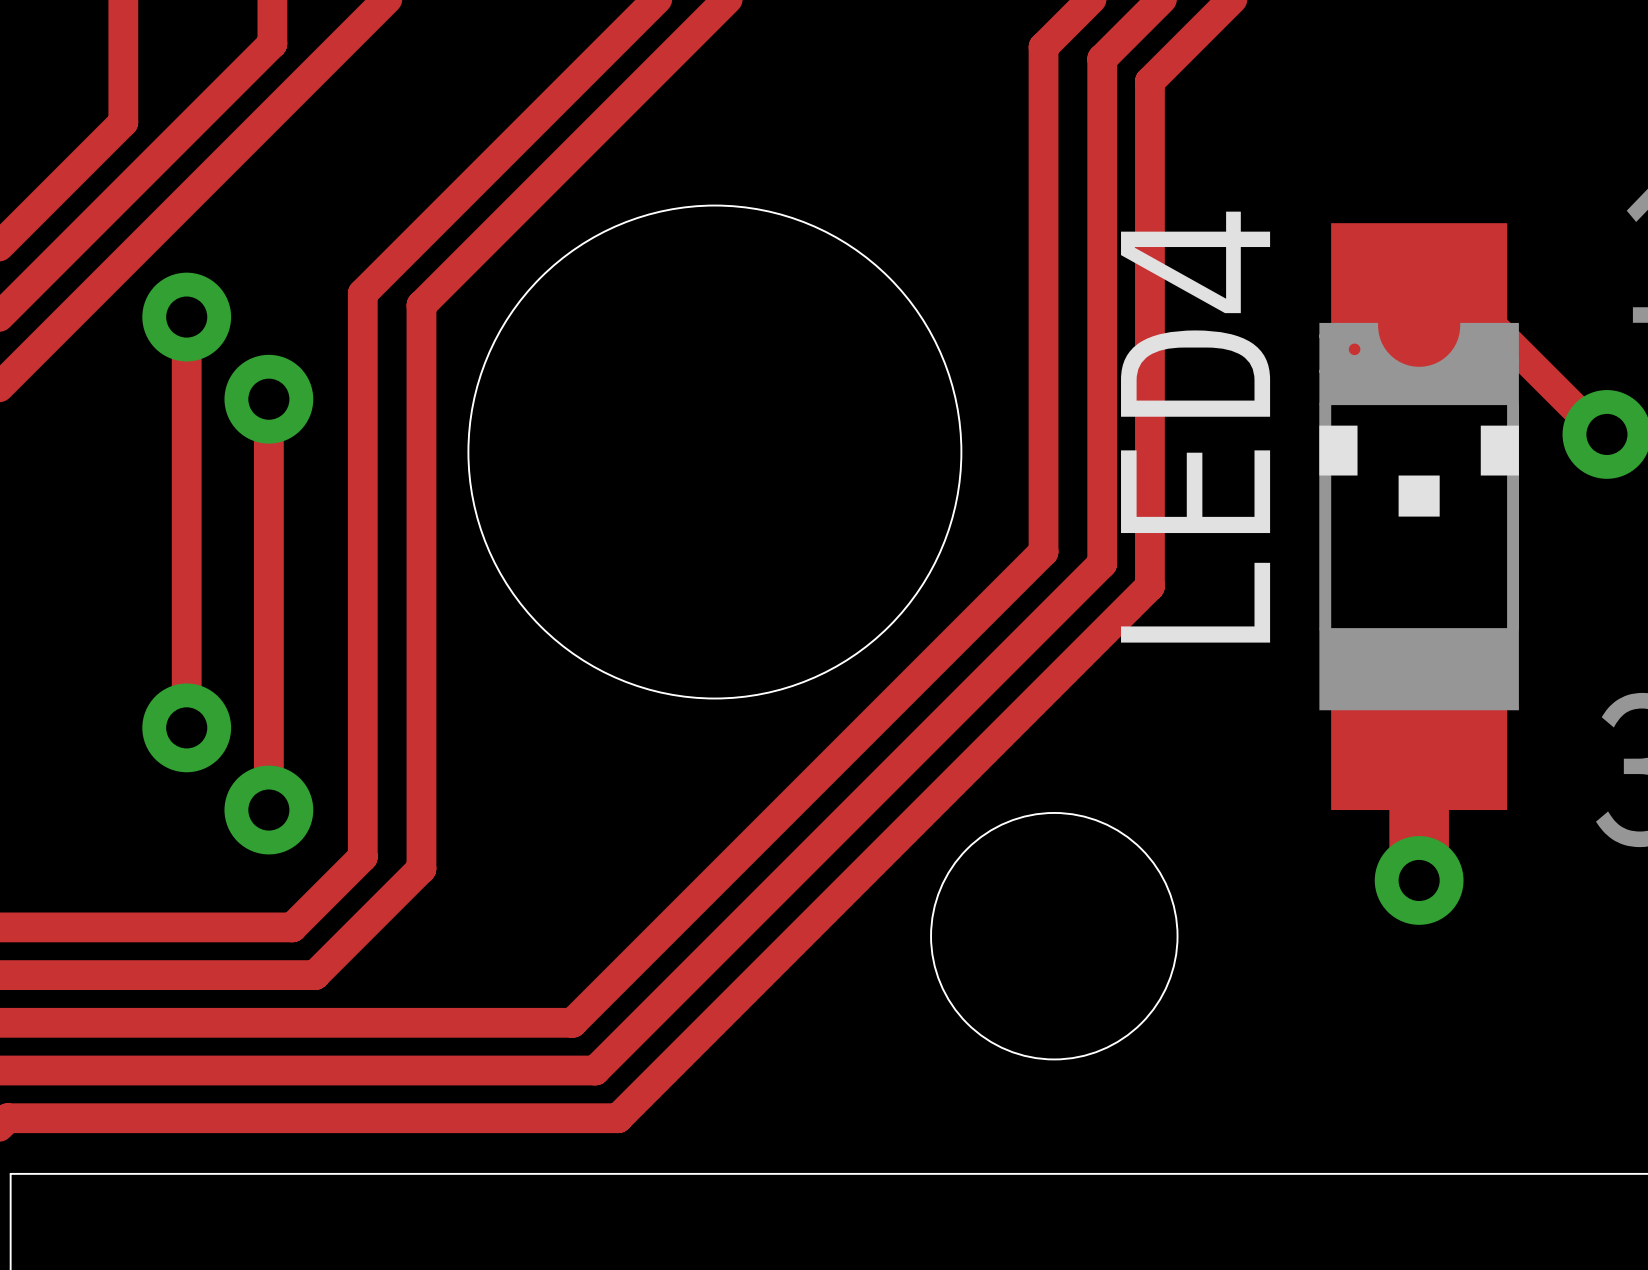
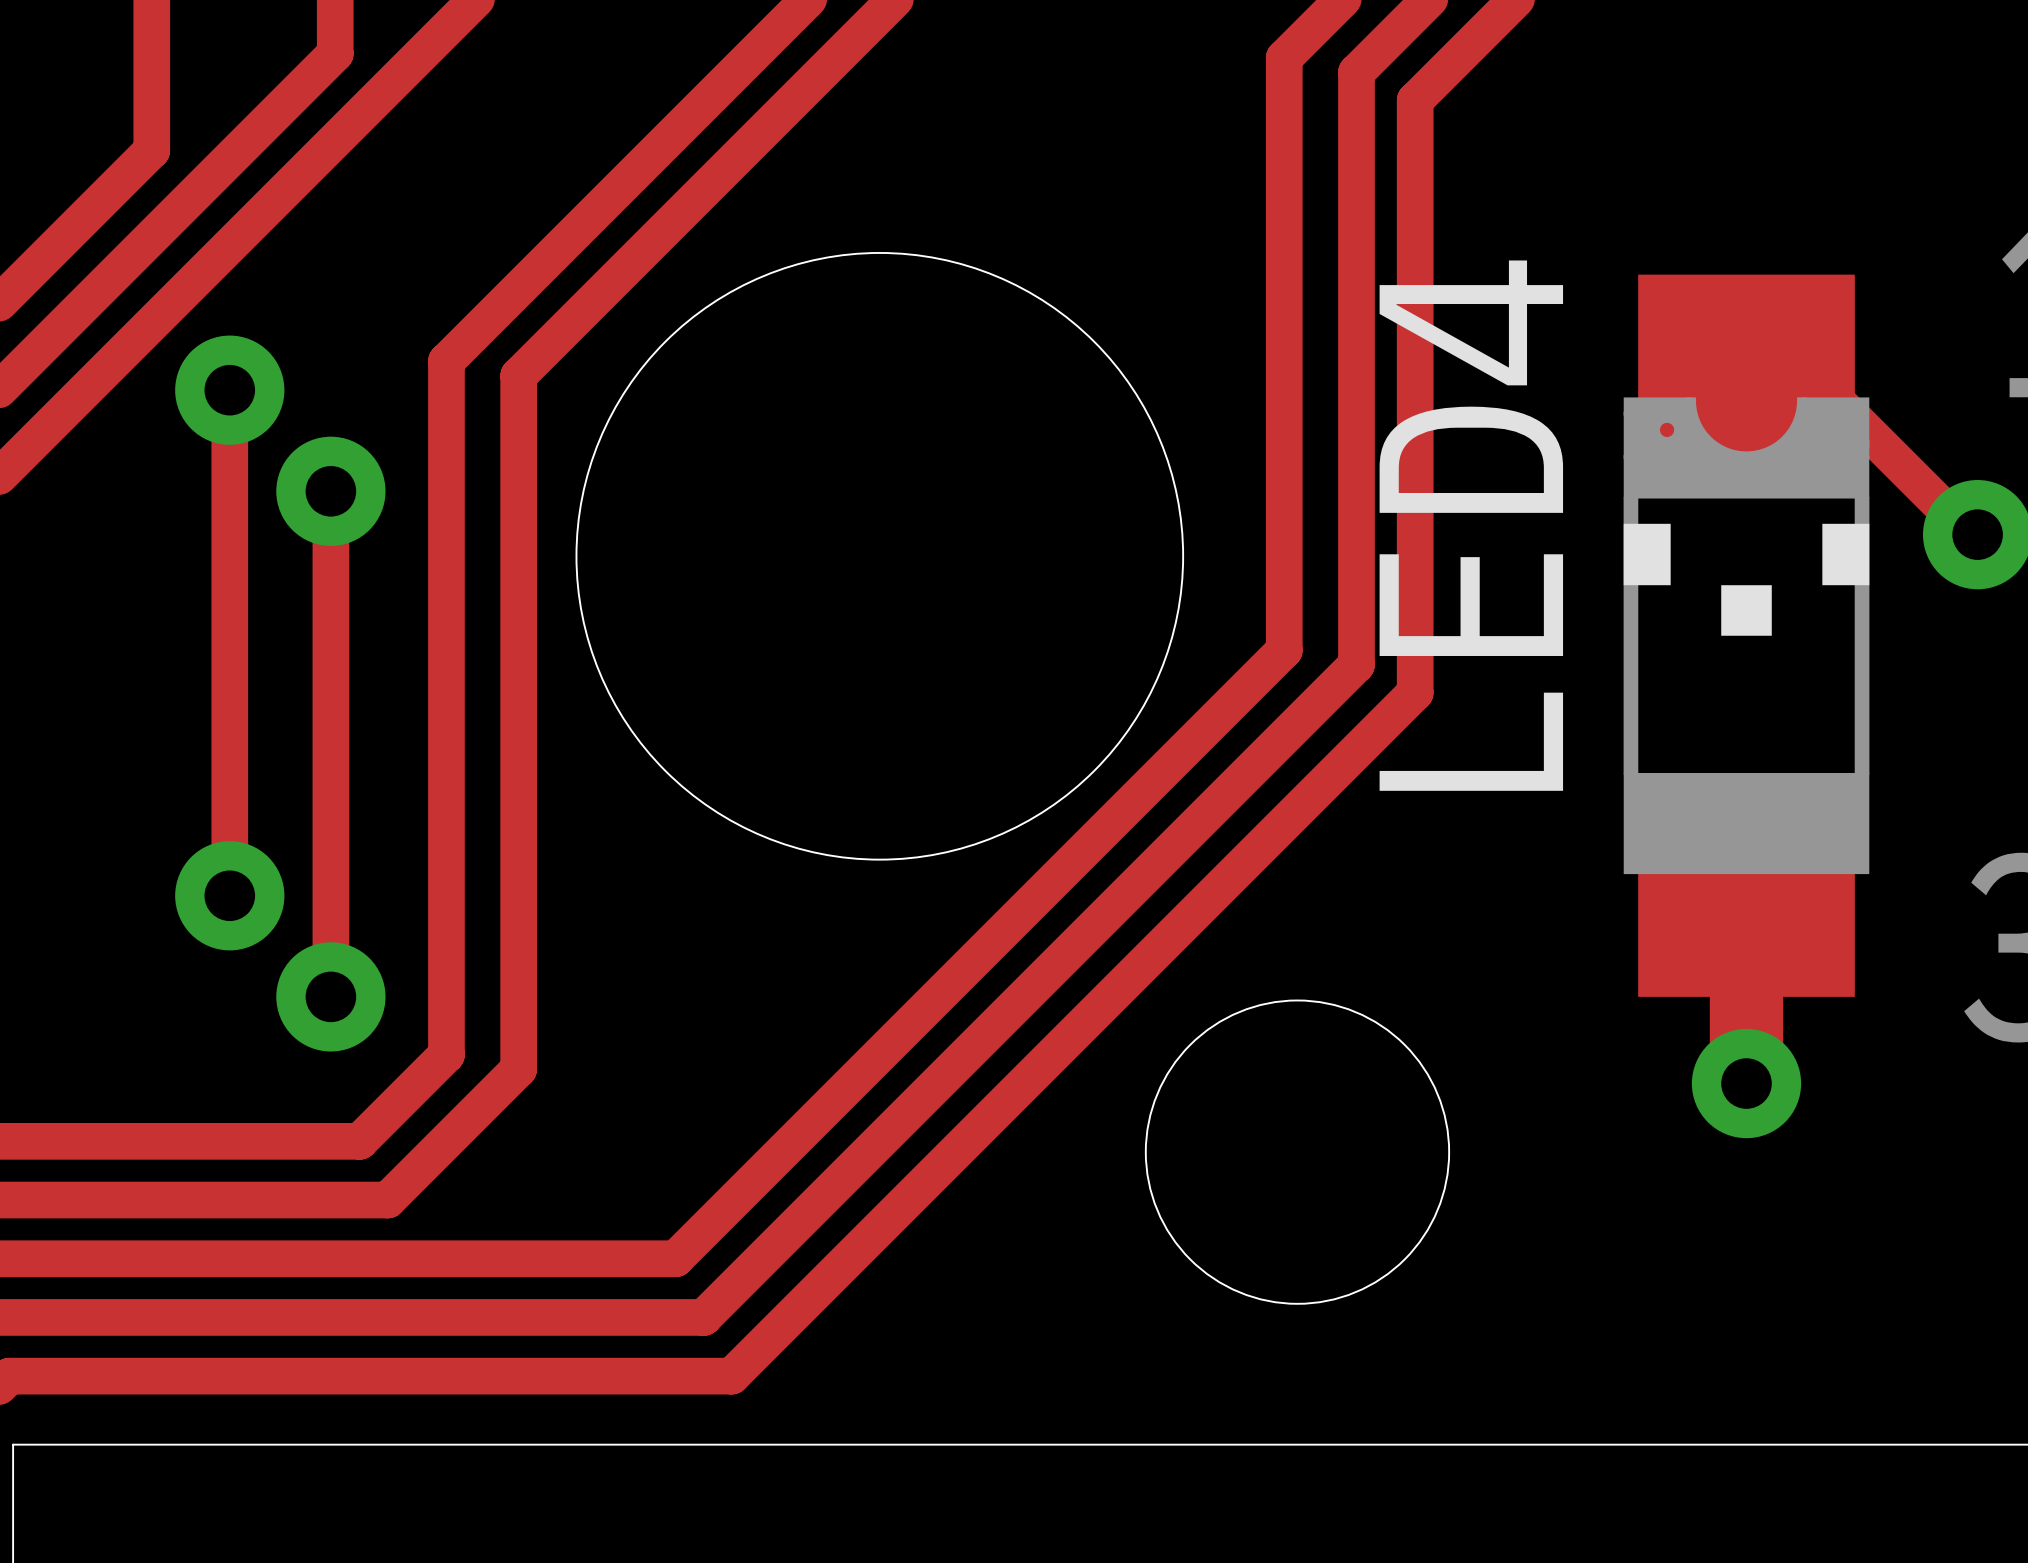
track: (1043, 528) (1043, 551) (572, 1022) (549, 1022) -> (1284, 650) (675, 1258)
track: (1102, 540) (1102, 563) (595, 1070) (571, 1070) -> (1356, 664) (703, 1317)
track: (1149, 562) (1149, 586) (617, 1118) (594, 1118) -> (1415, 692) (731, 1376)

